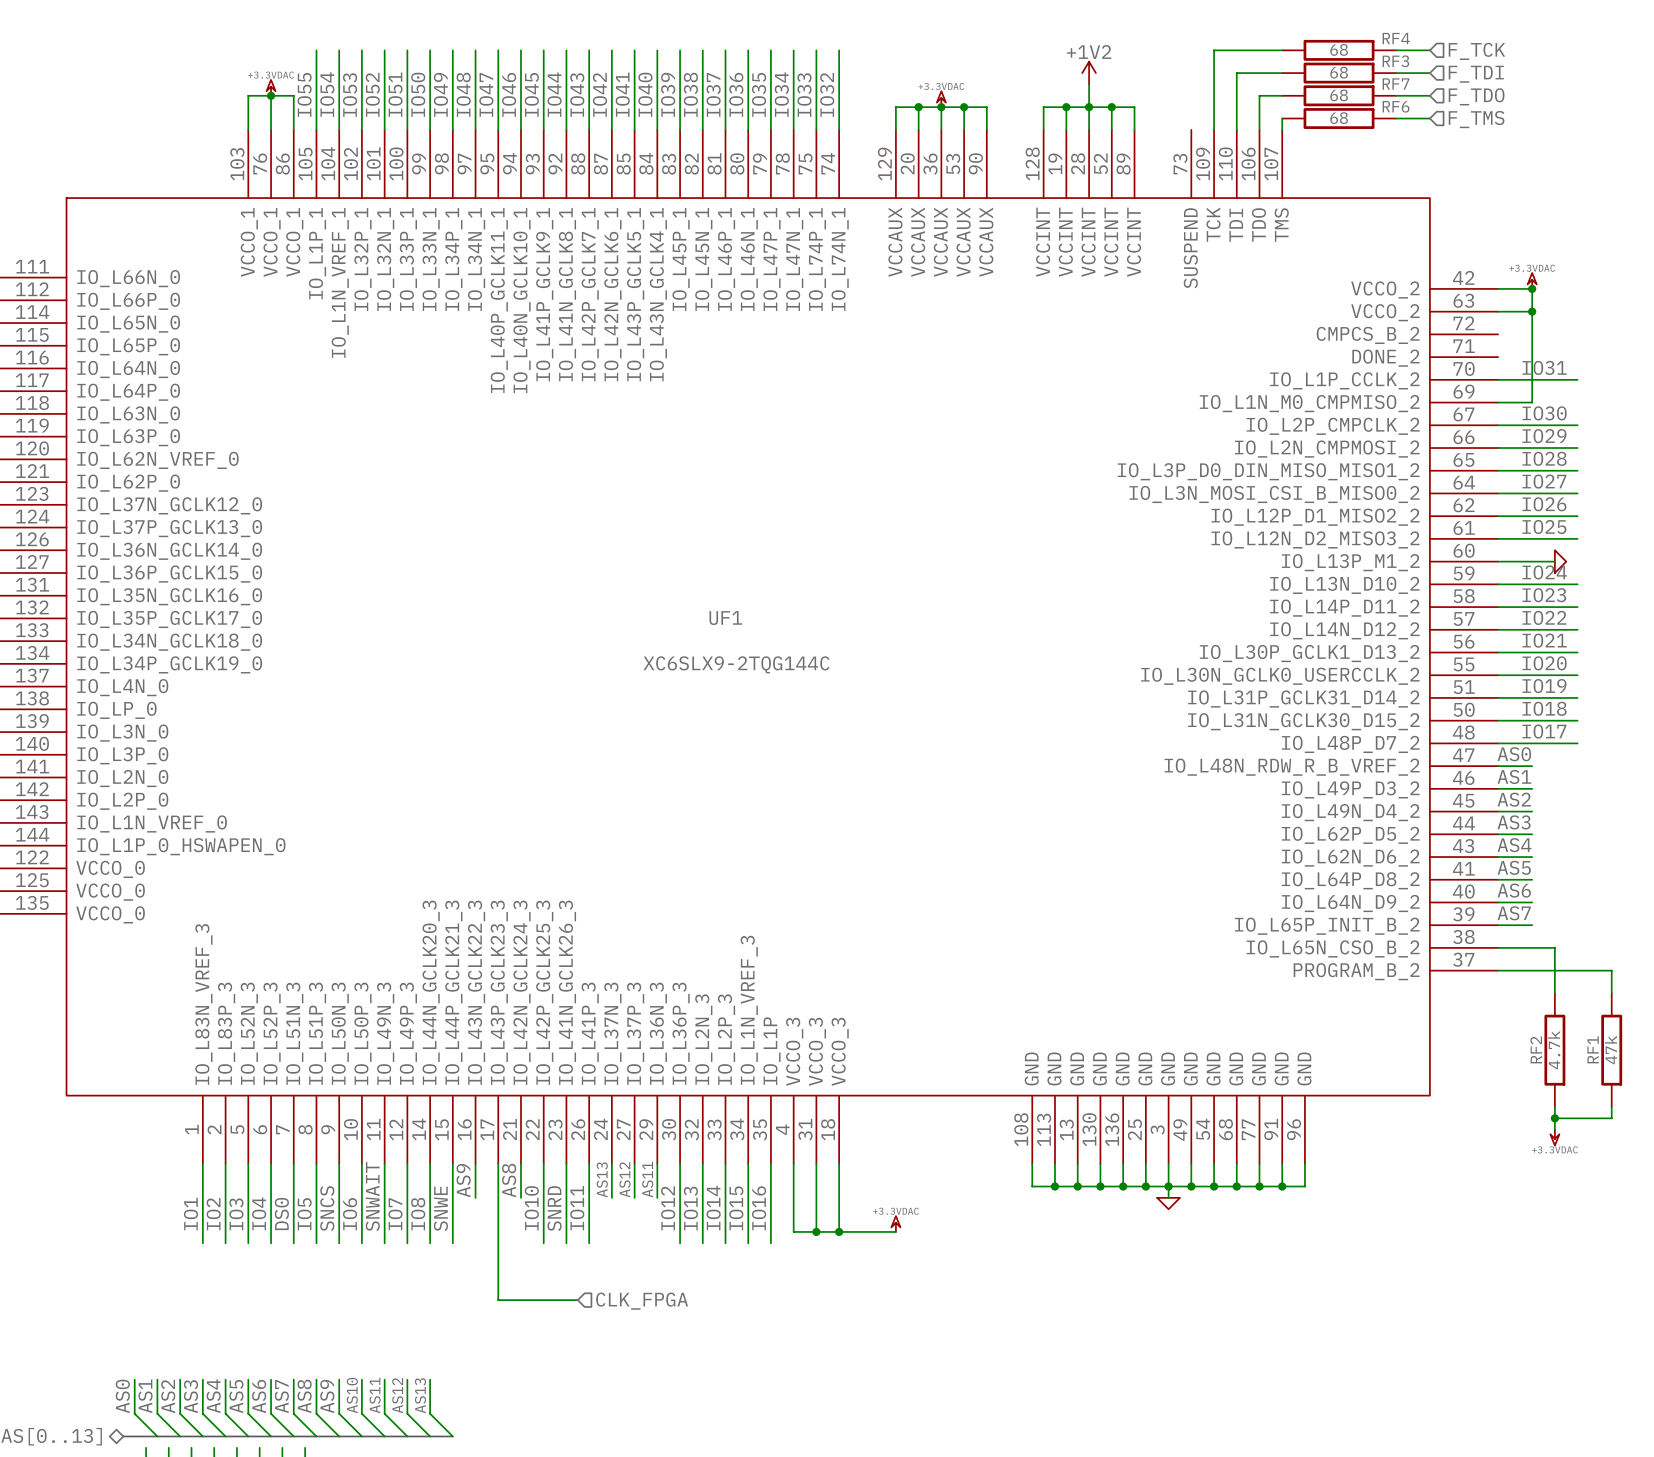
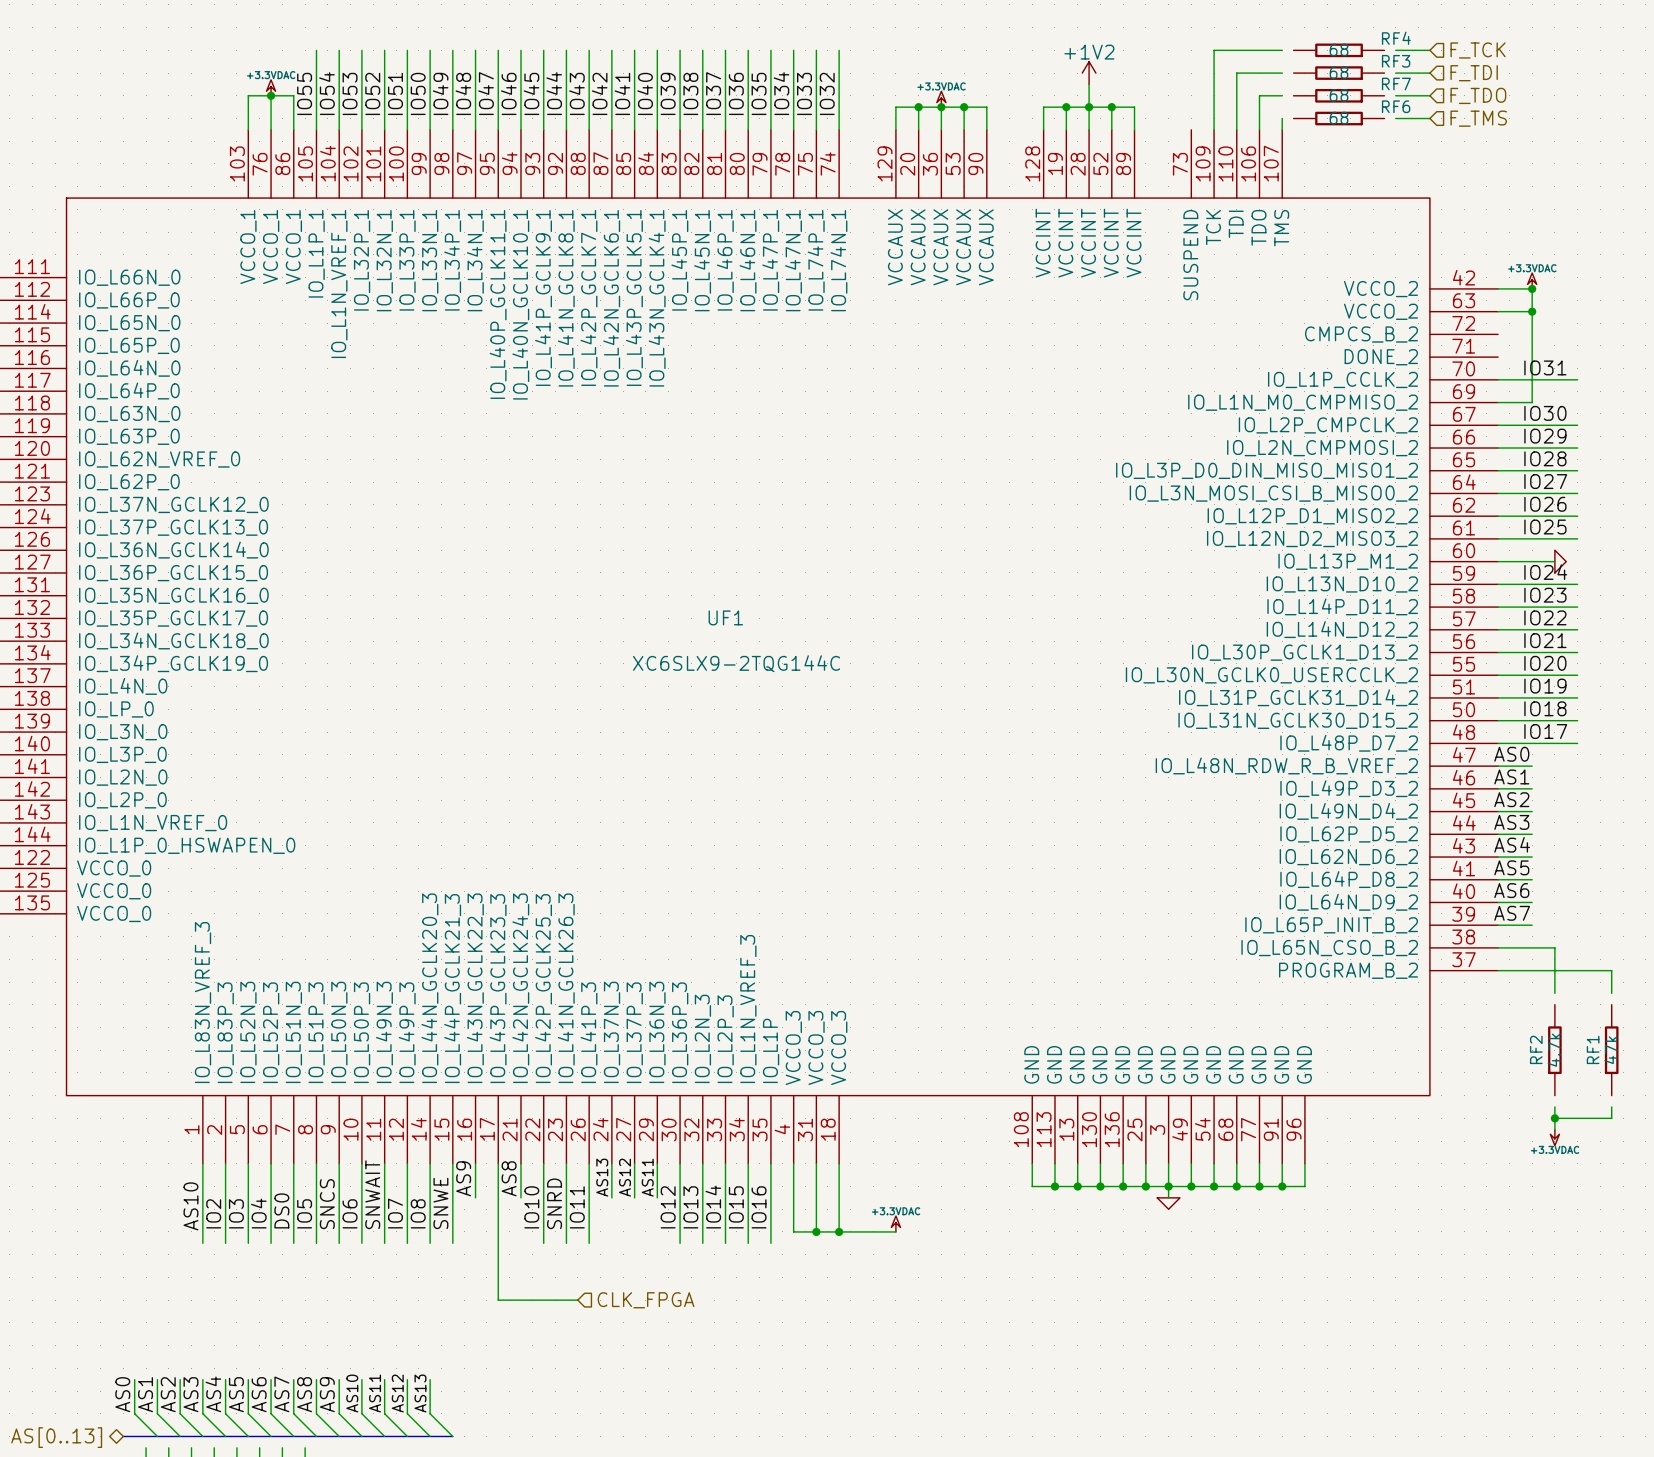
RF4 symbol: [1282, 39, 1396, 61] -> [1293, 43, 1385, 58]
RF3 symbol: [1282, 62, 1396, 84] -> [1293, 66, 1385, 80]
RF7 symbol: [1282, 85, 1396, 107] -> [1293, 88, 1385, 103]
RF6 symbol: [1282, 108, 1396, 129] -> [1293, 111, 1385, 126]
RF2 symbol: [1544, 993, 1566, 1107] -> [1548, 1004, 1562, 1096]
RF1 symbol: [1601, 993, 1623, 1107] -> [1604, 1004, 1619, 1096]
label: IO1 (190, 1214) -> AS10 (190, 1206)

